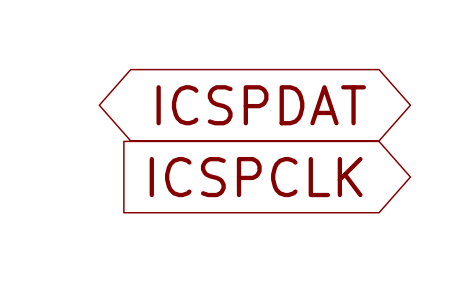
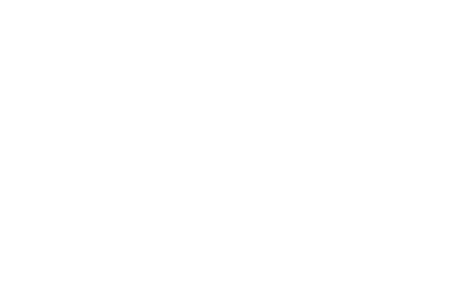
global label: ICSPDAT (261, 105) -> none
global label: ICSPCLK (256, 177) -> none

